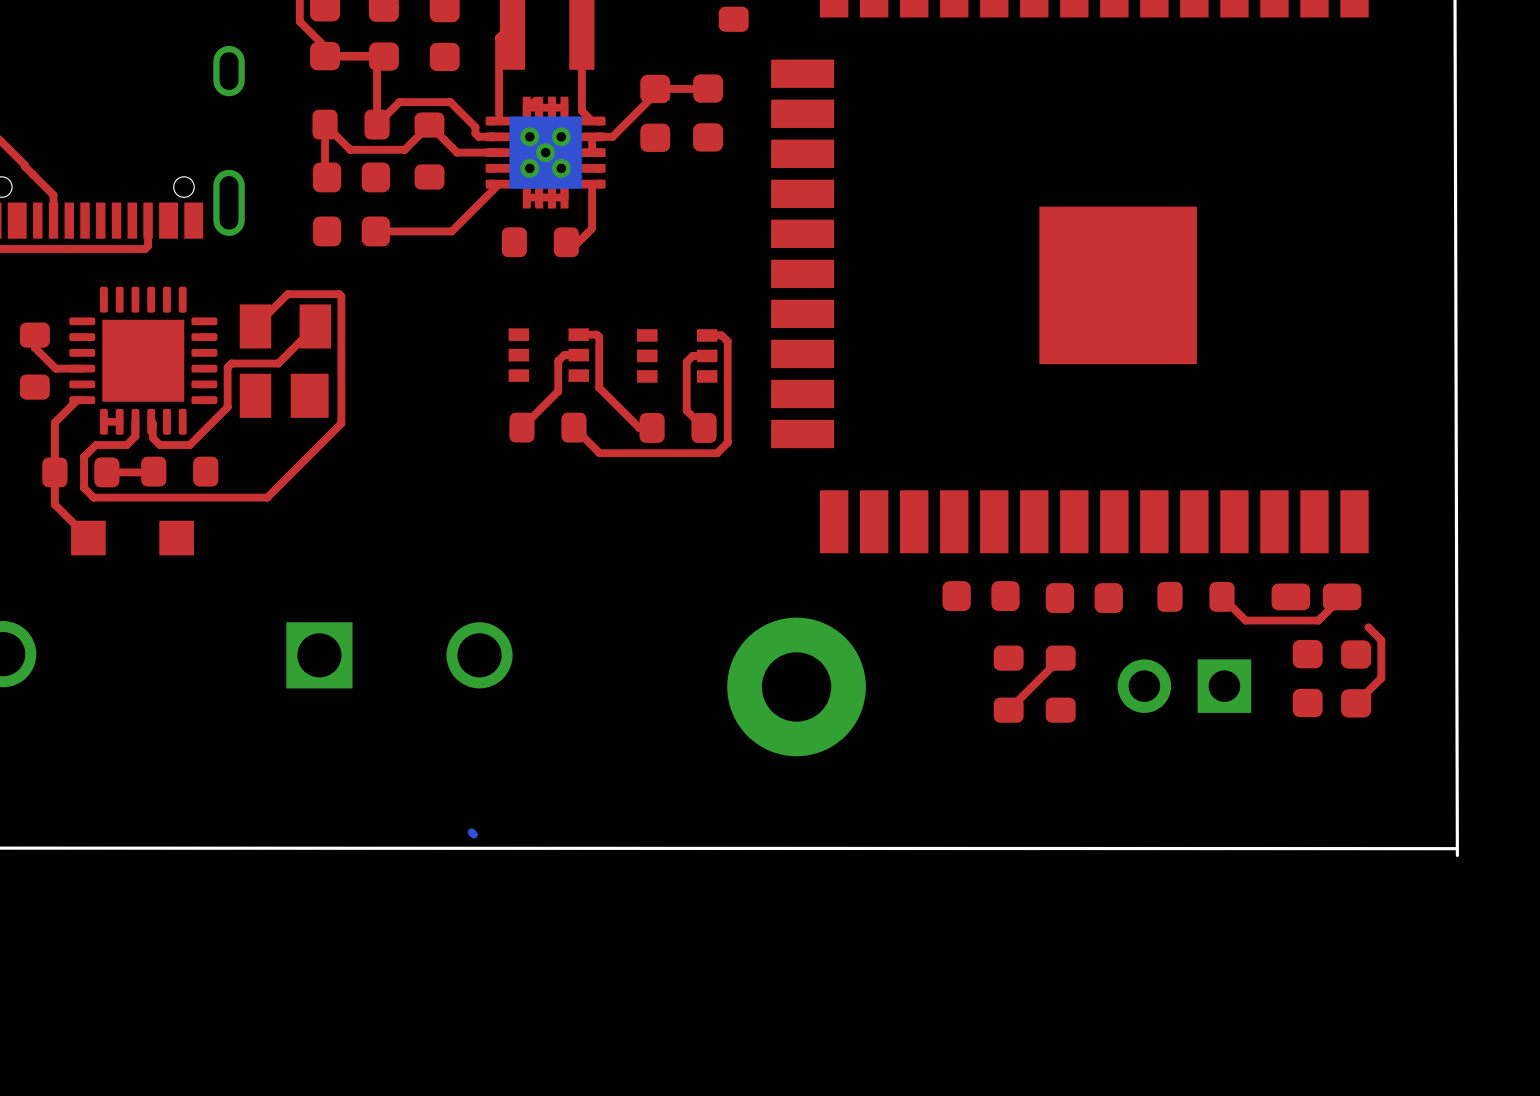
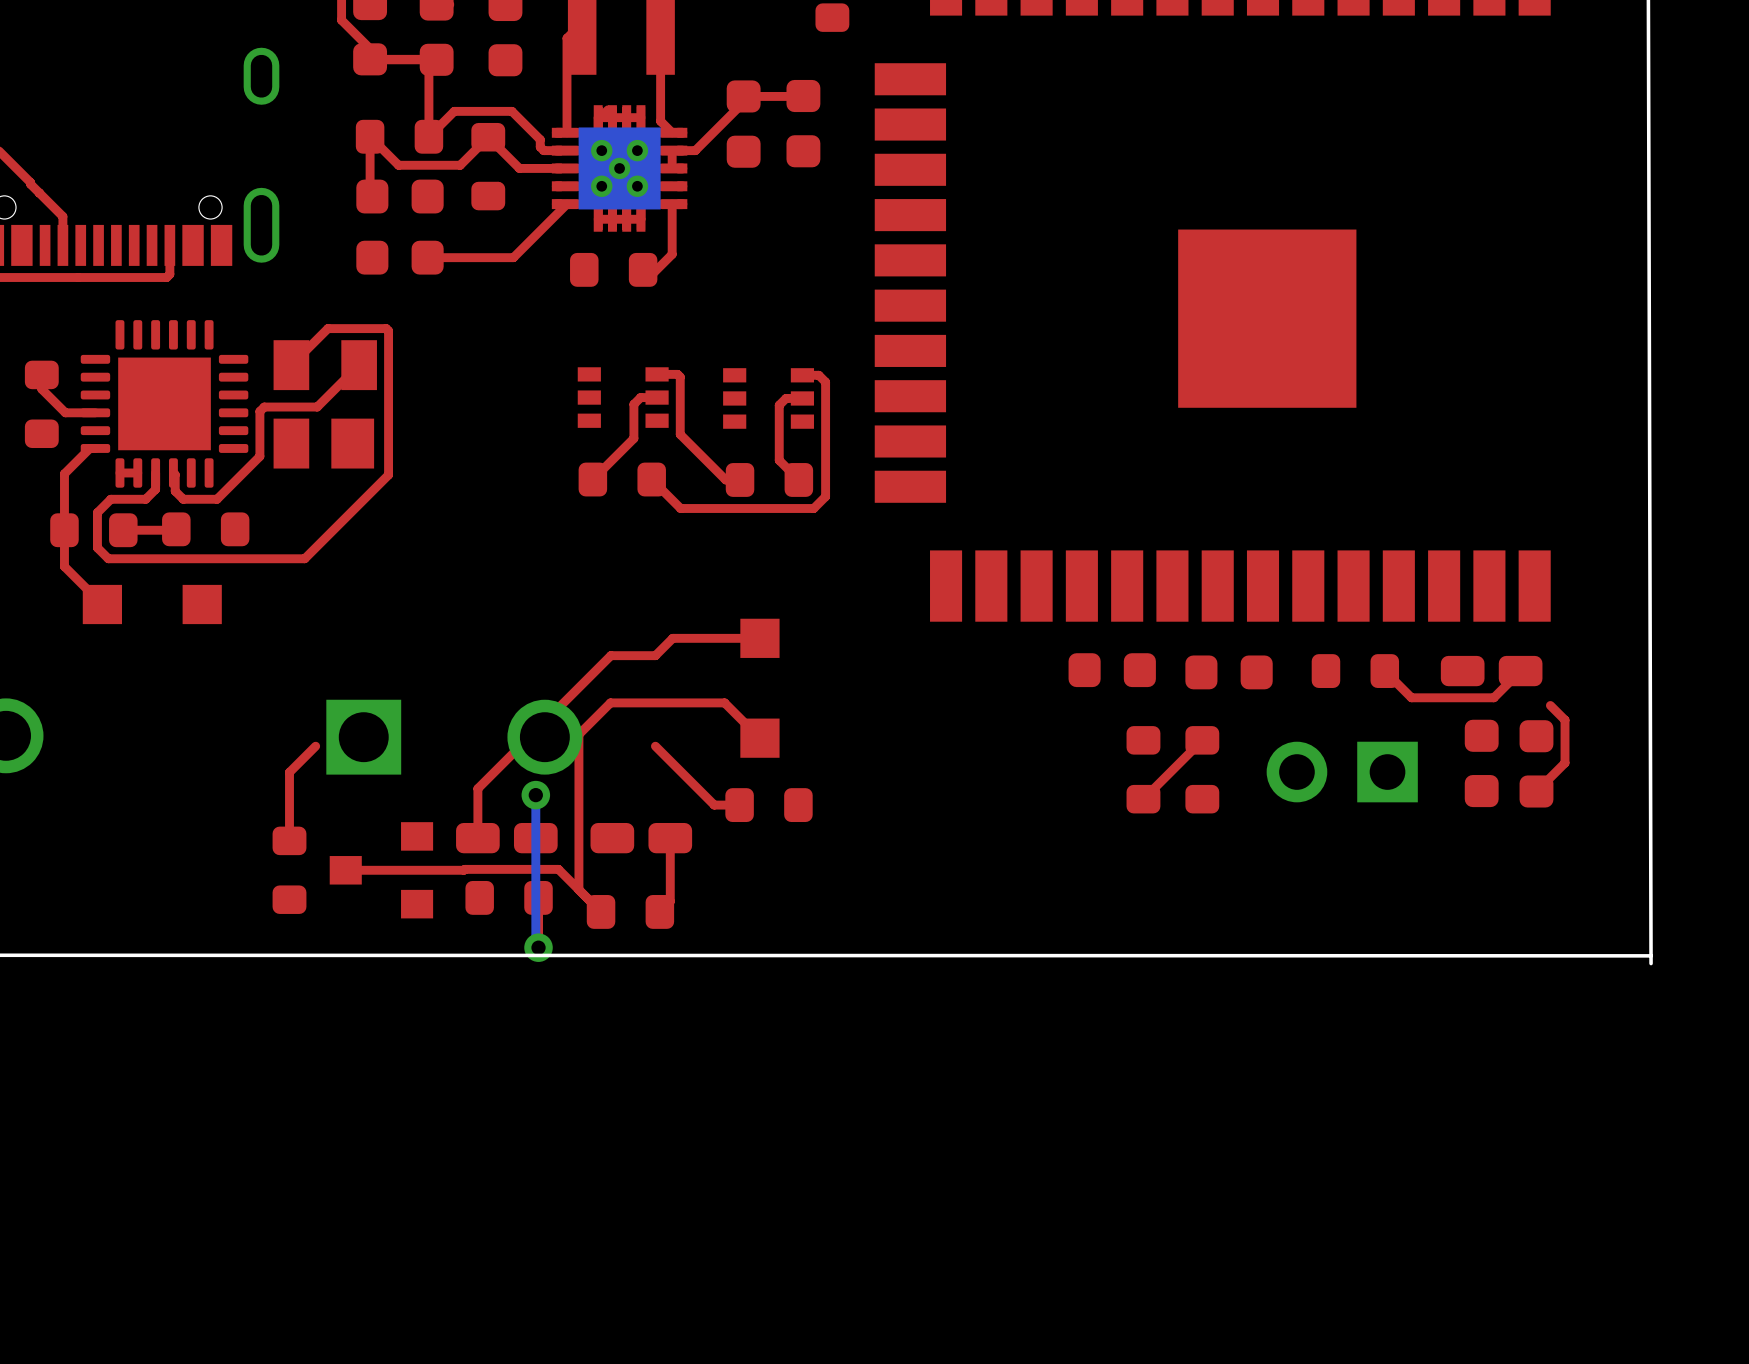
top track: none -> (759, 638) (672, 638) (655, 655) (610, 655) (477, 788) (477, 838)
part: none -> (759, 688)
top track: none -> (759, 738) (724, 702) (610, 702) (578, 734) (578, 889)
top track: none -> (315, 746) (289, 772) (289, 840)
top track: none -> (655, 746) (714, 805) (739, 805)
part: (796, 686) -> none
bottom track: none -> (535, 795) (535, 944) (538, 947)
via: none -> (535, 795)
part: none -> (769, 805)
part: none -> (506, 838)
part: none -> (641, 838)
top track: none -> (670, 838) (670, 901) (659, 911)
part: none -> (289, 870)
top track: none -> (345, 870) (558, 869) (601, 911)
part: none -> (381, 870)
part: none -> (509, 897)
part: none -> (630, 911)
via: none -> (538, 947)

